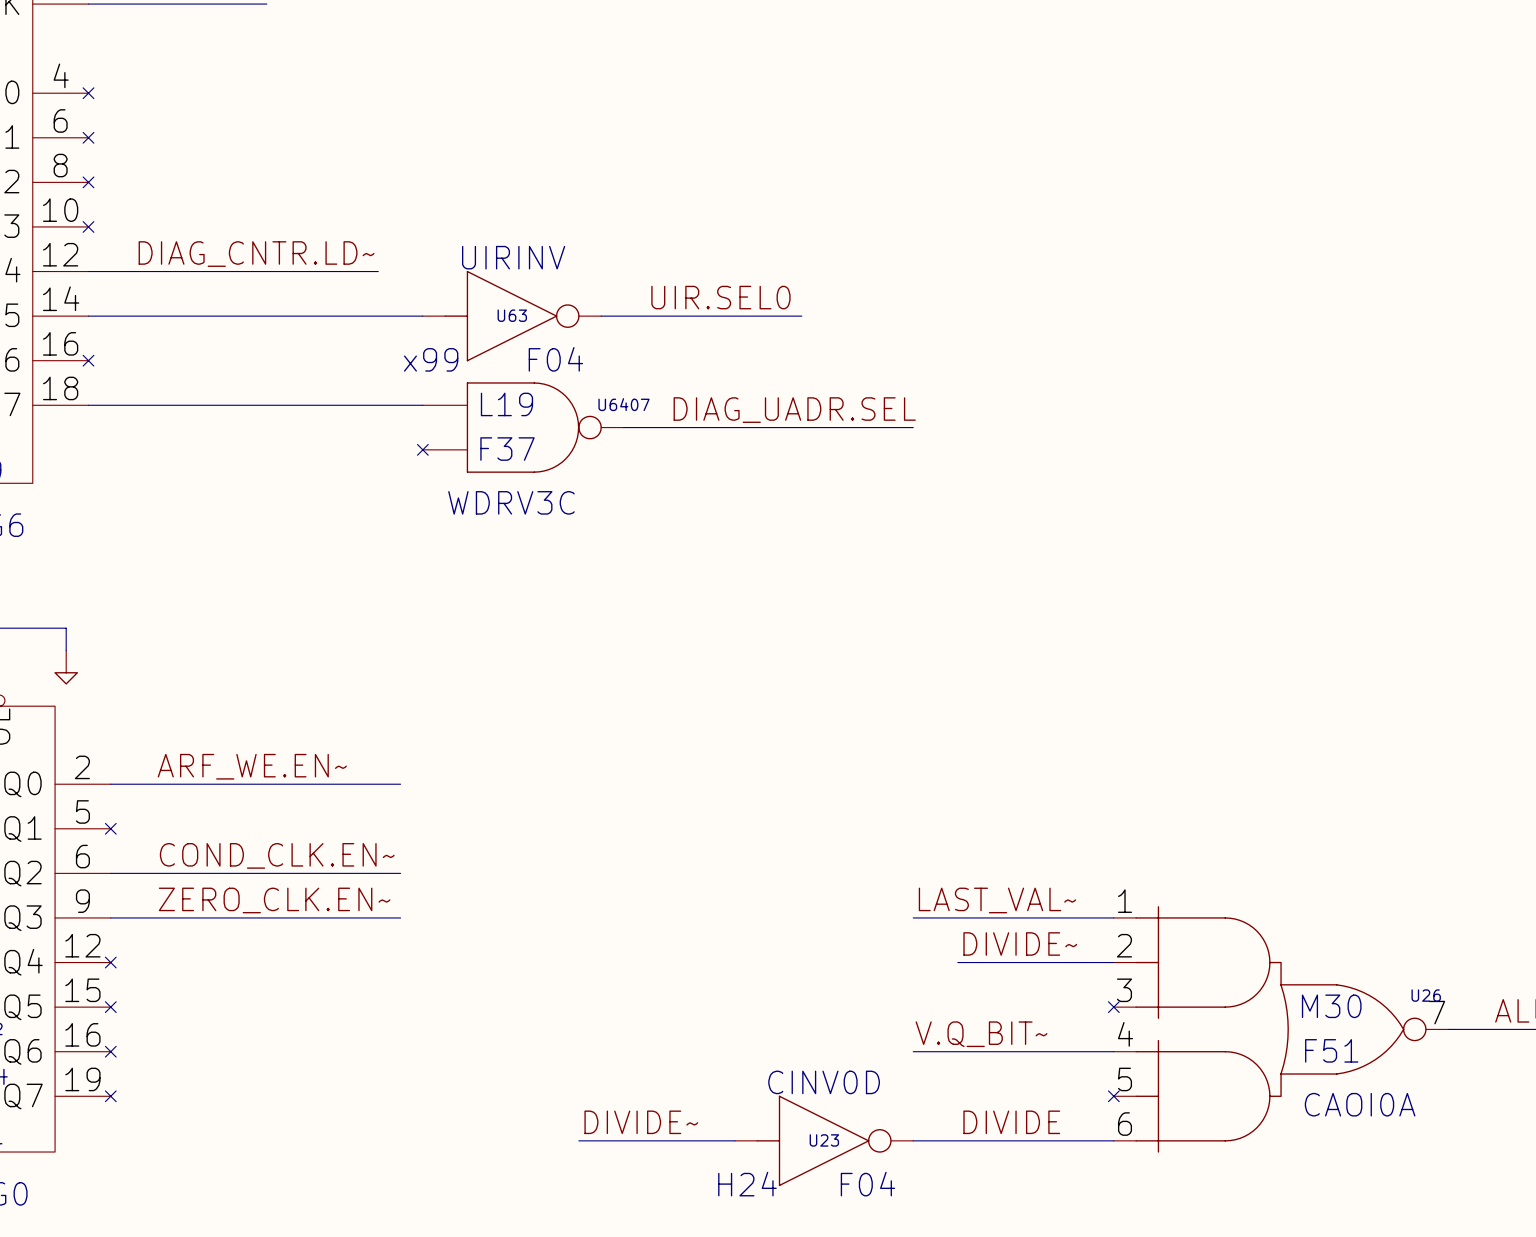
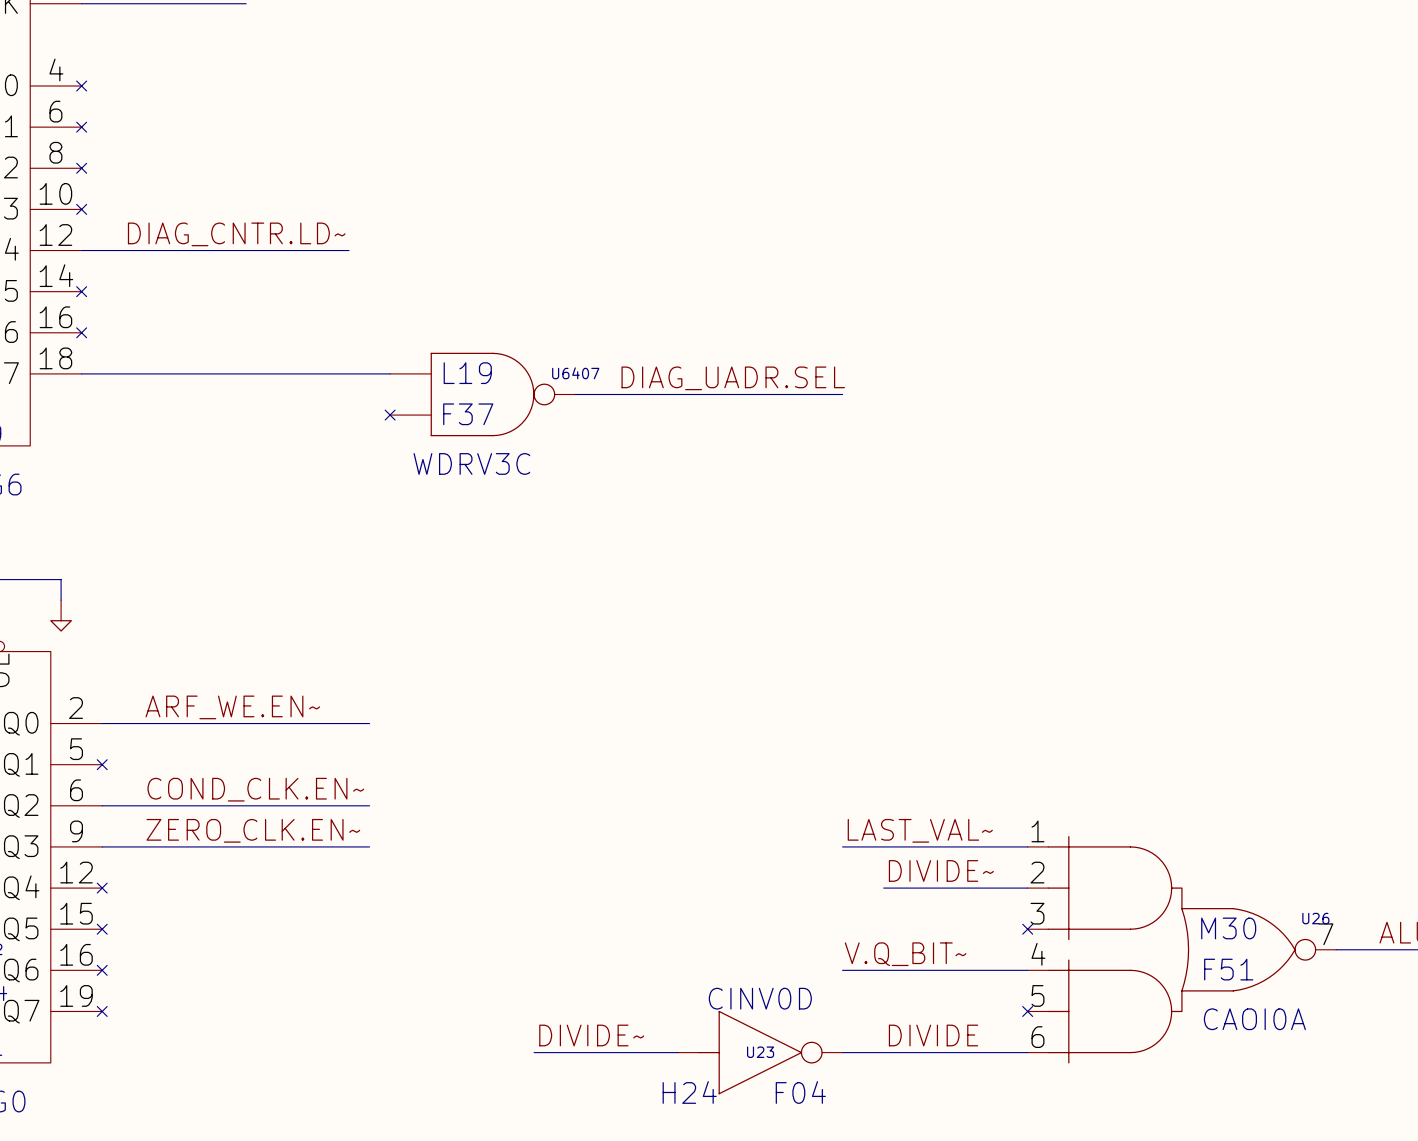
label: UIR.SEL0 (720, 297) -> none
wire: (88, 316) (422, 316) -> none
no-connect mark: none -> (81, 291)
U63: F04 (512, 316) -> none
wire: (601, 316) (801, 316) -> none

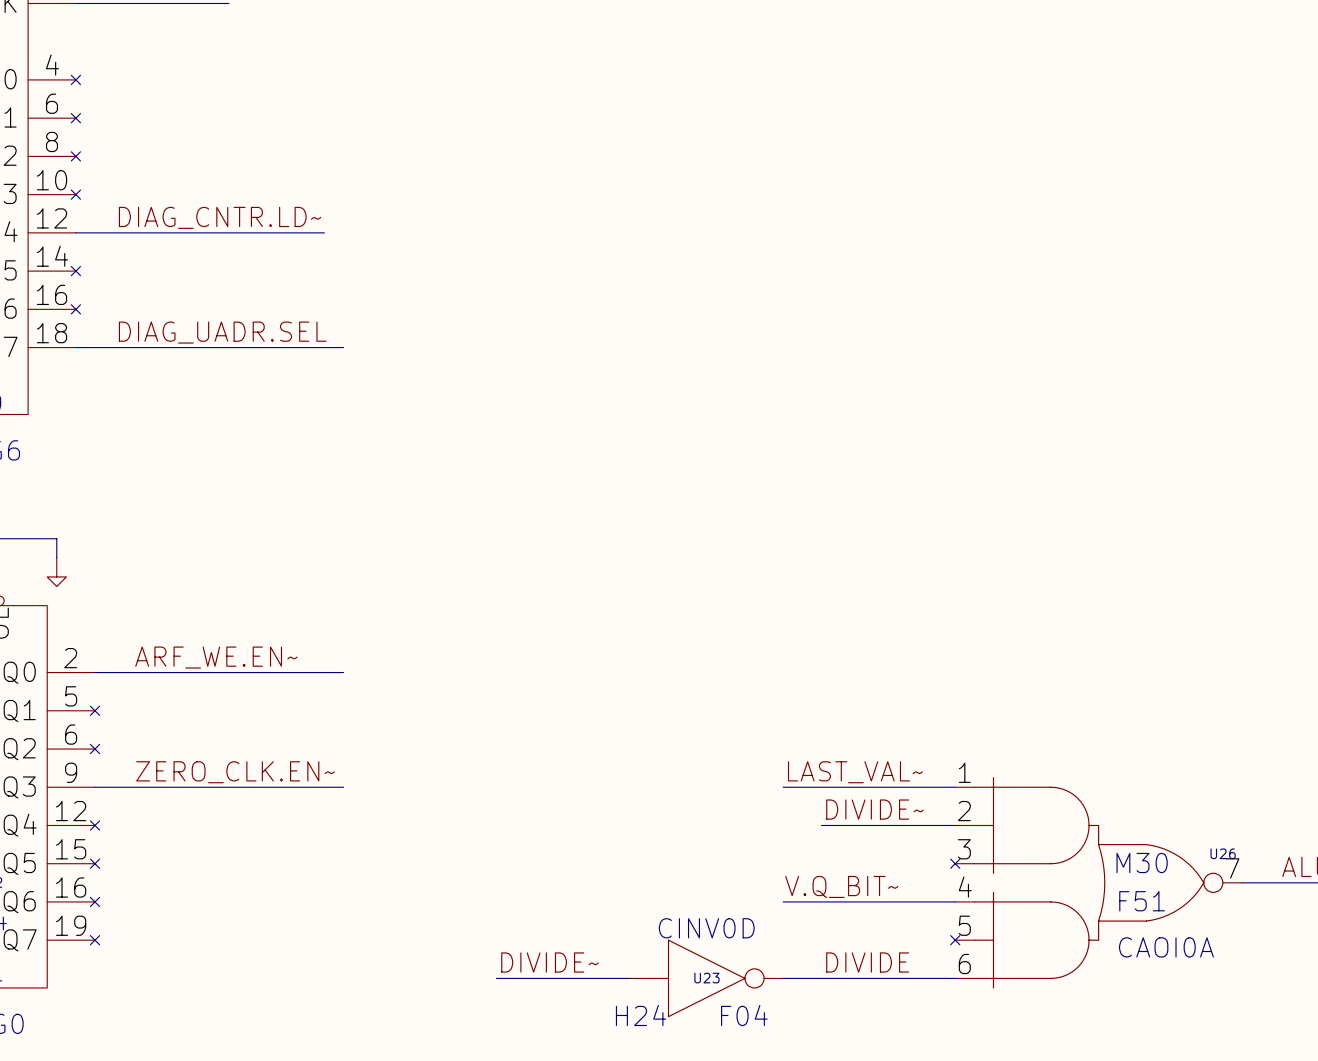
label: none -> DIAG_UADR.SEL (222, 332)
wire: (369, 373) (390, 373) -> none
label: DIAG_UADR.SEL (733, 378) -> none
U6407: F37 (482, 394) -> none
wire: (575, 394) (842, 394) -> none
no-connect mark: (390, 415) -> none
label: COND_CLK.EN~ (255, 789) -> none
wire: (102, 805) (369, 805) -> none
no-connect mark: none -> (95, 749)

